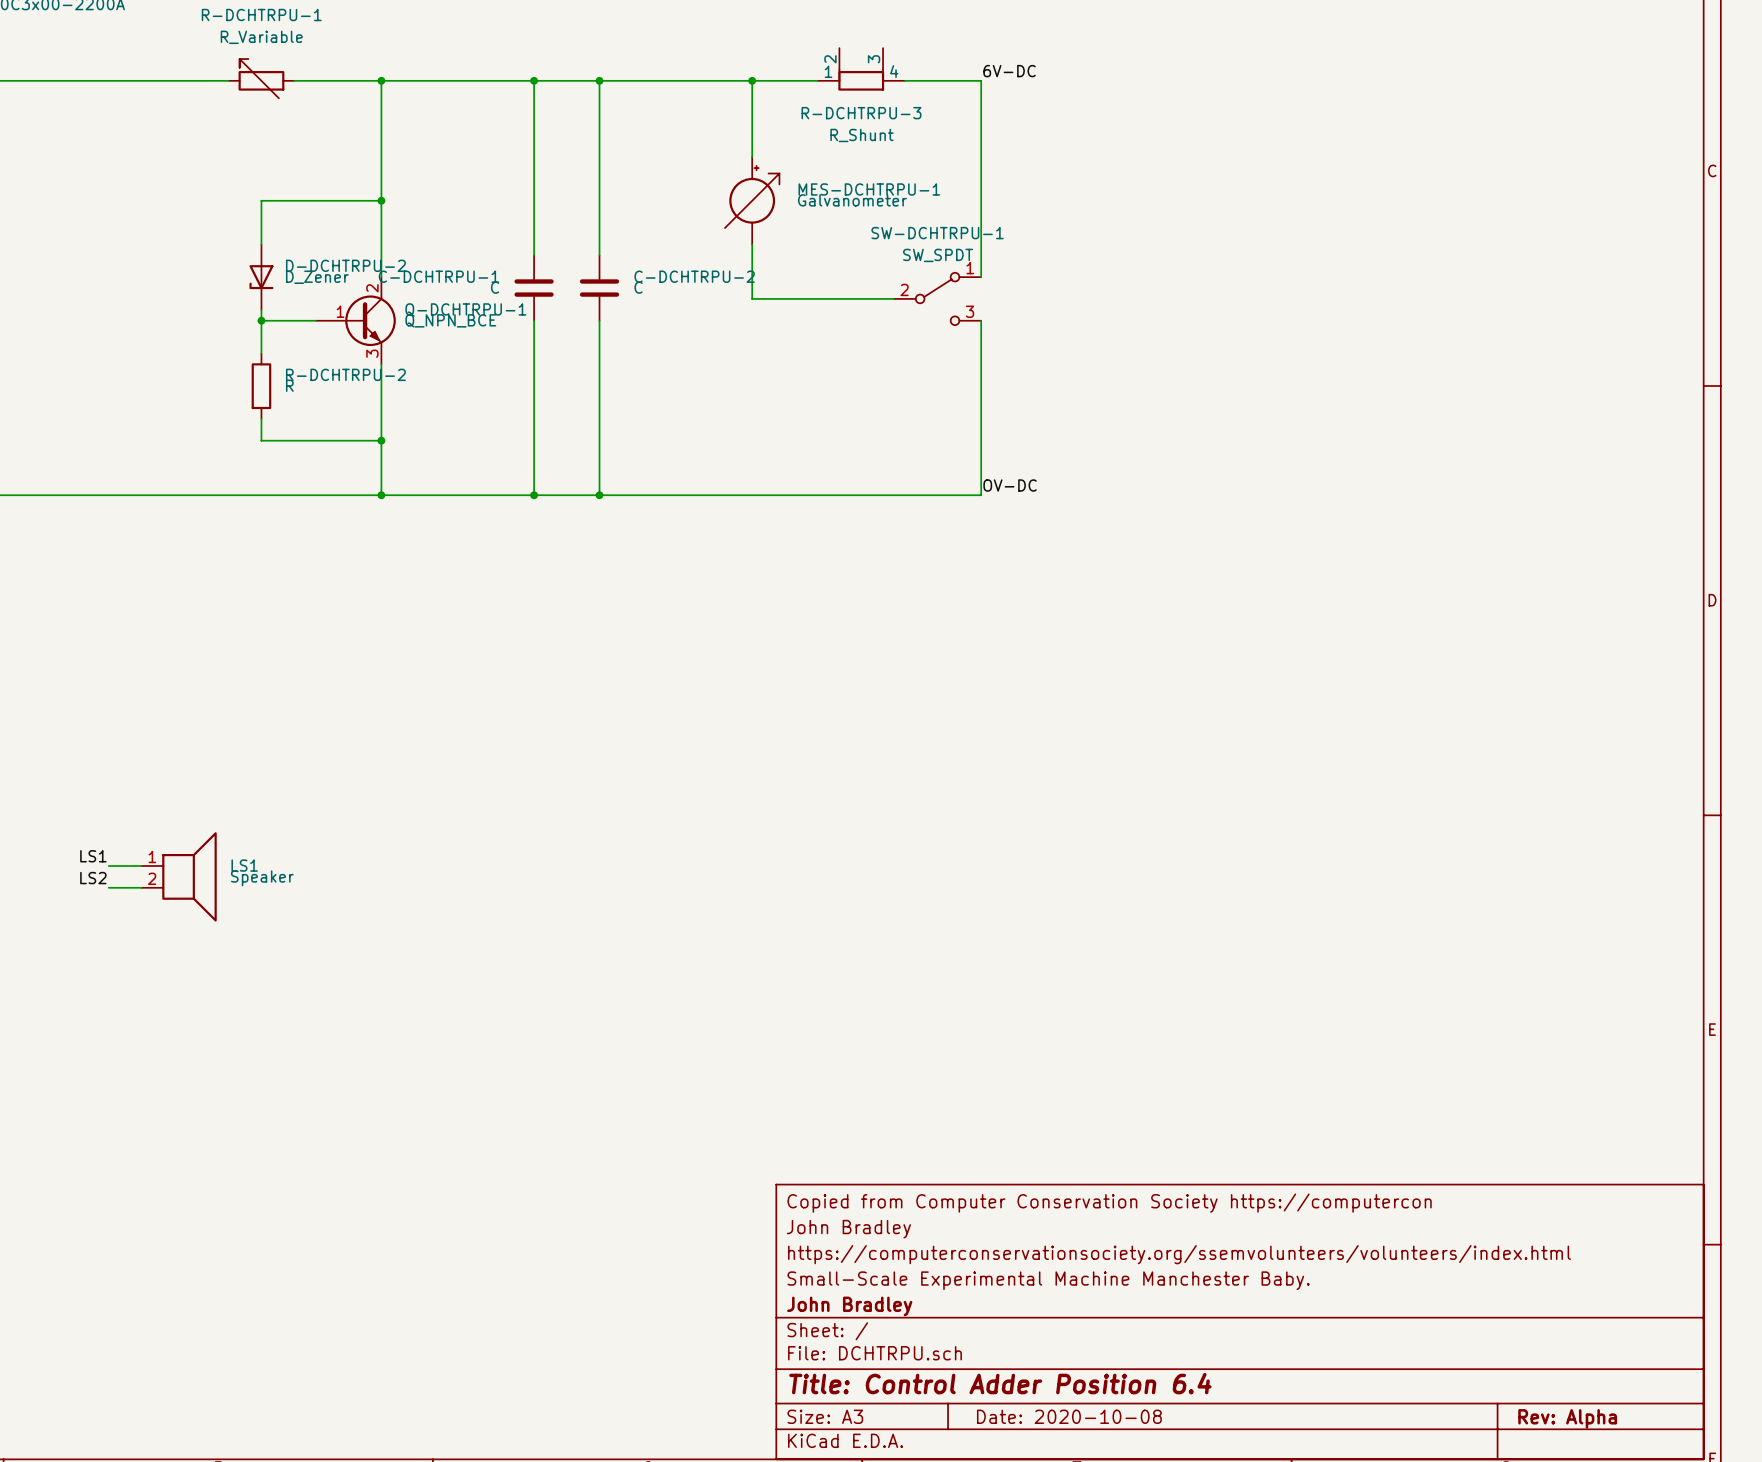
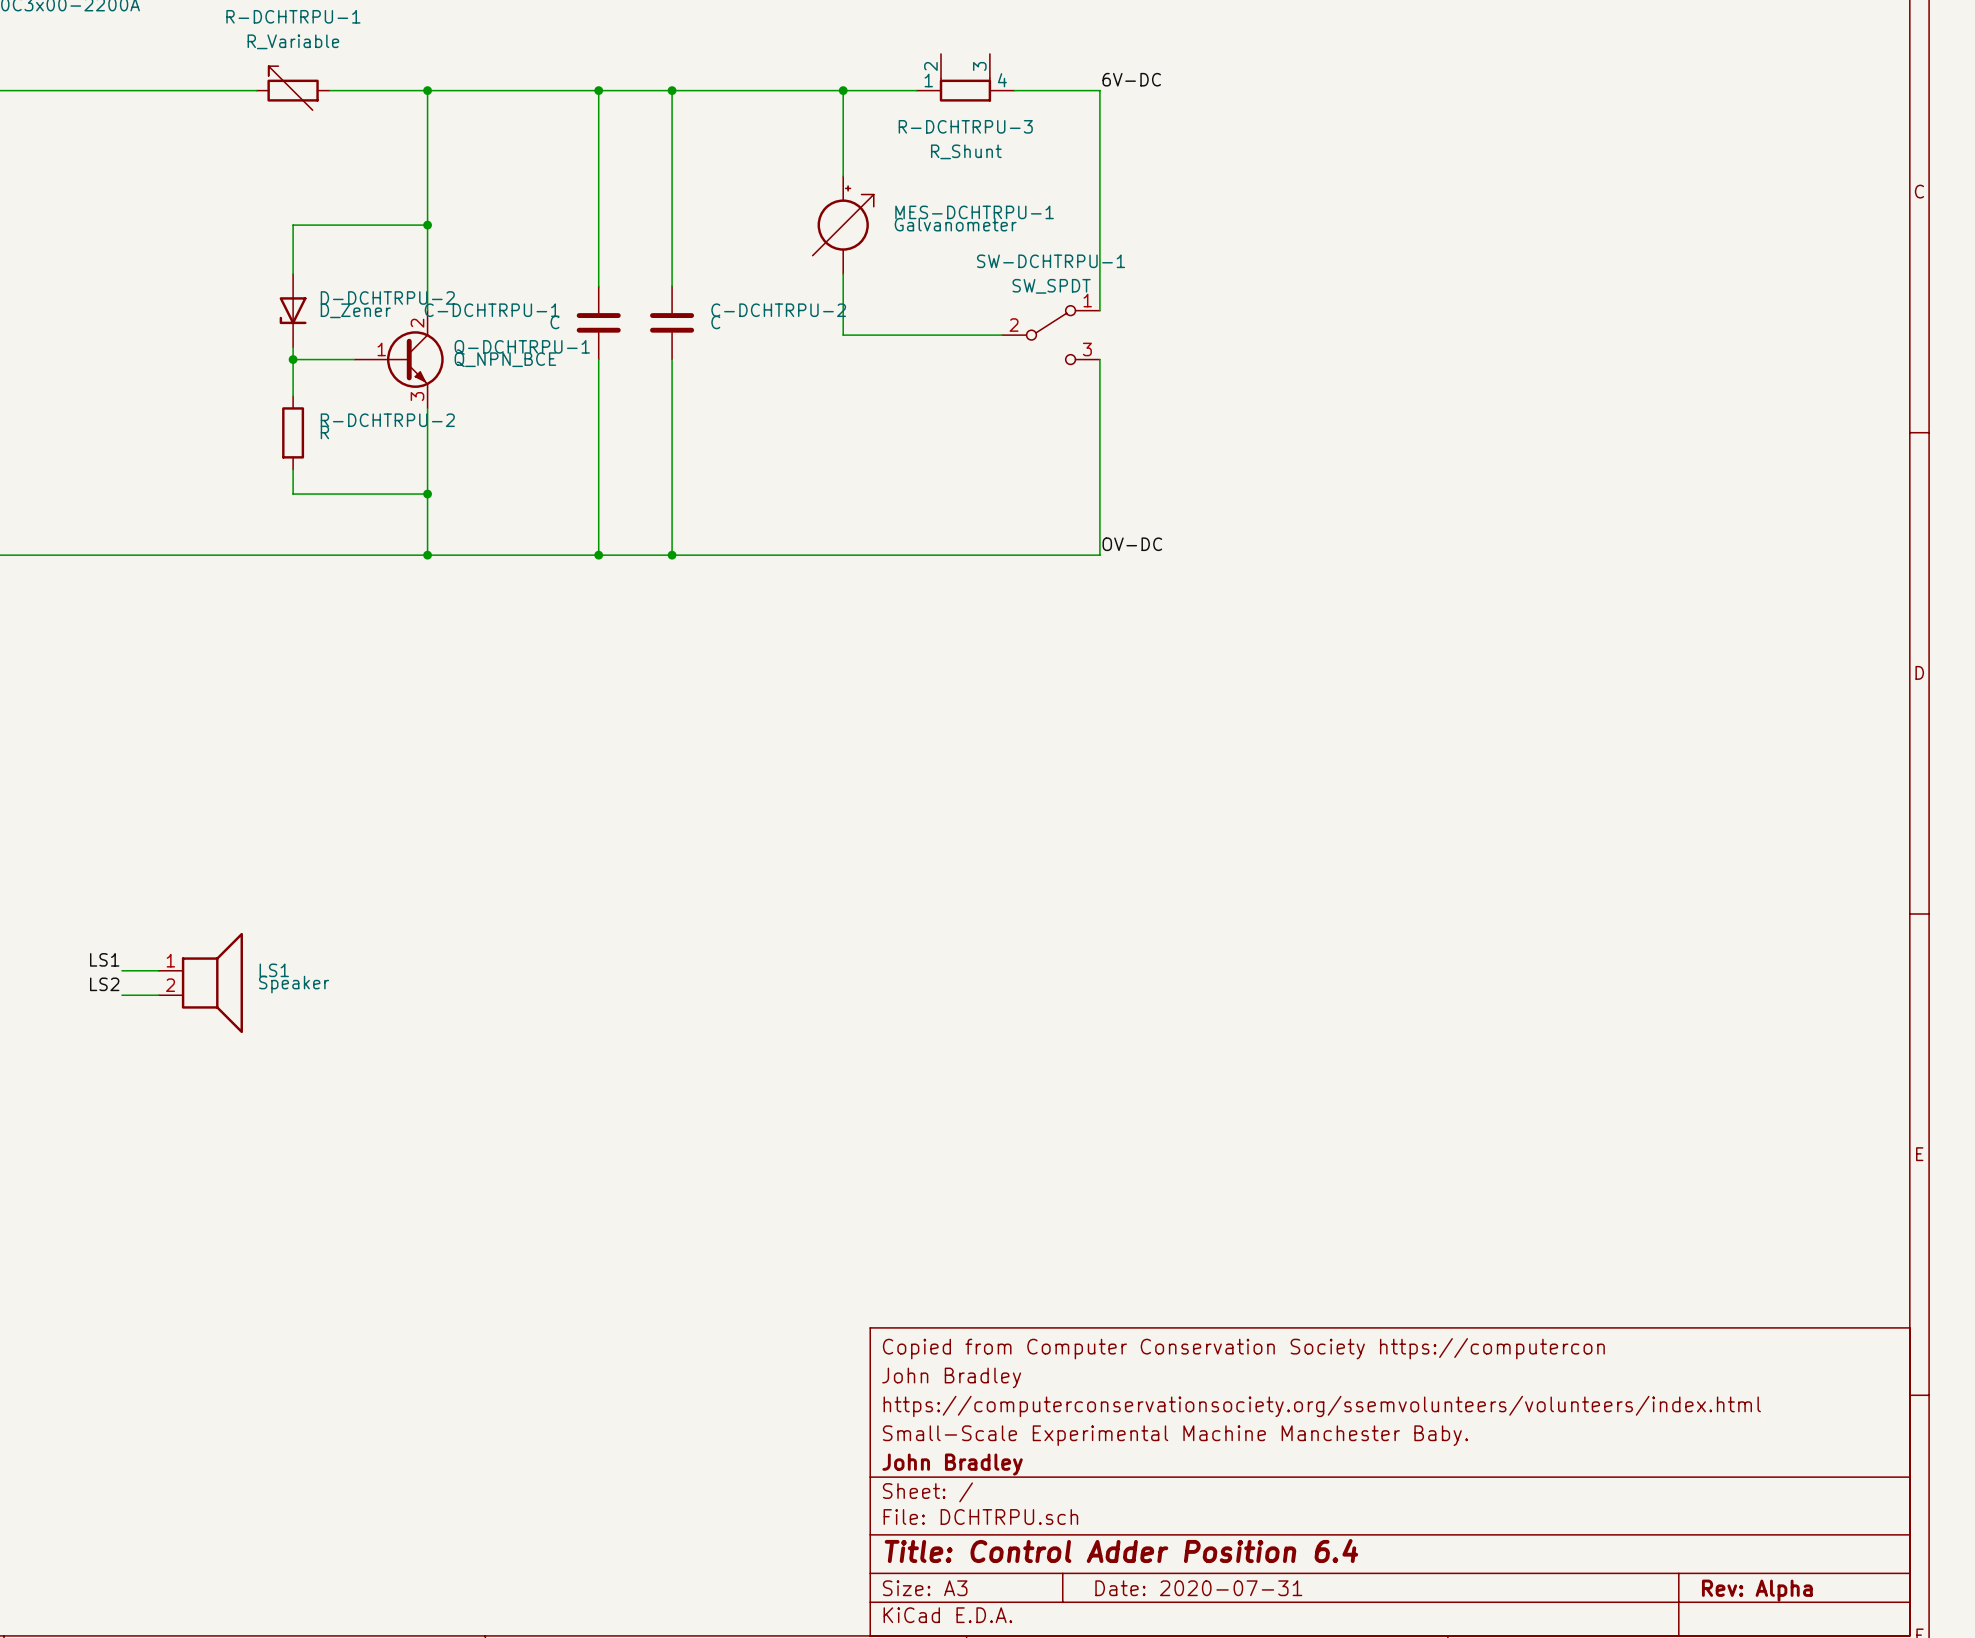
title block: Date: 2020-10-08 (1069, 1416) -> Date: 2020-07-31 (1198, 1588)

